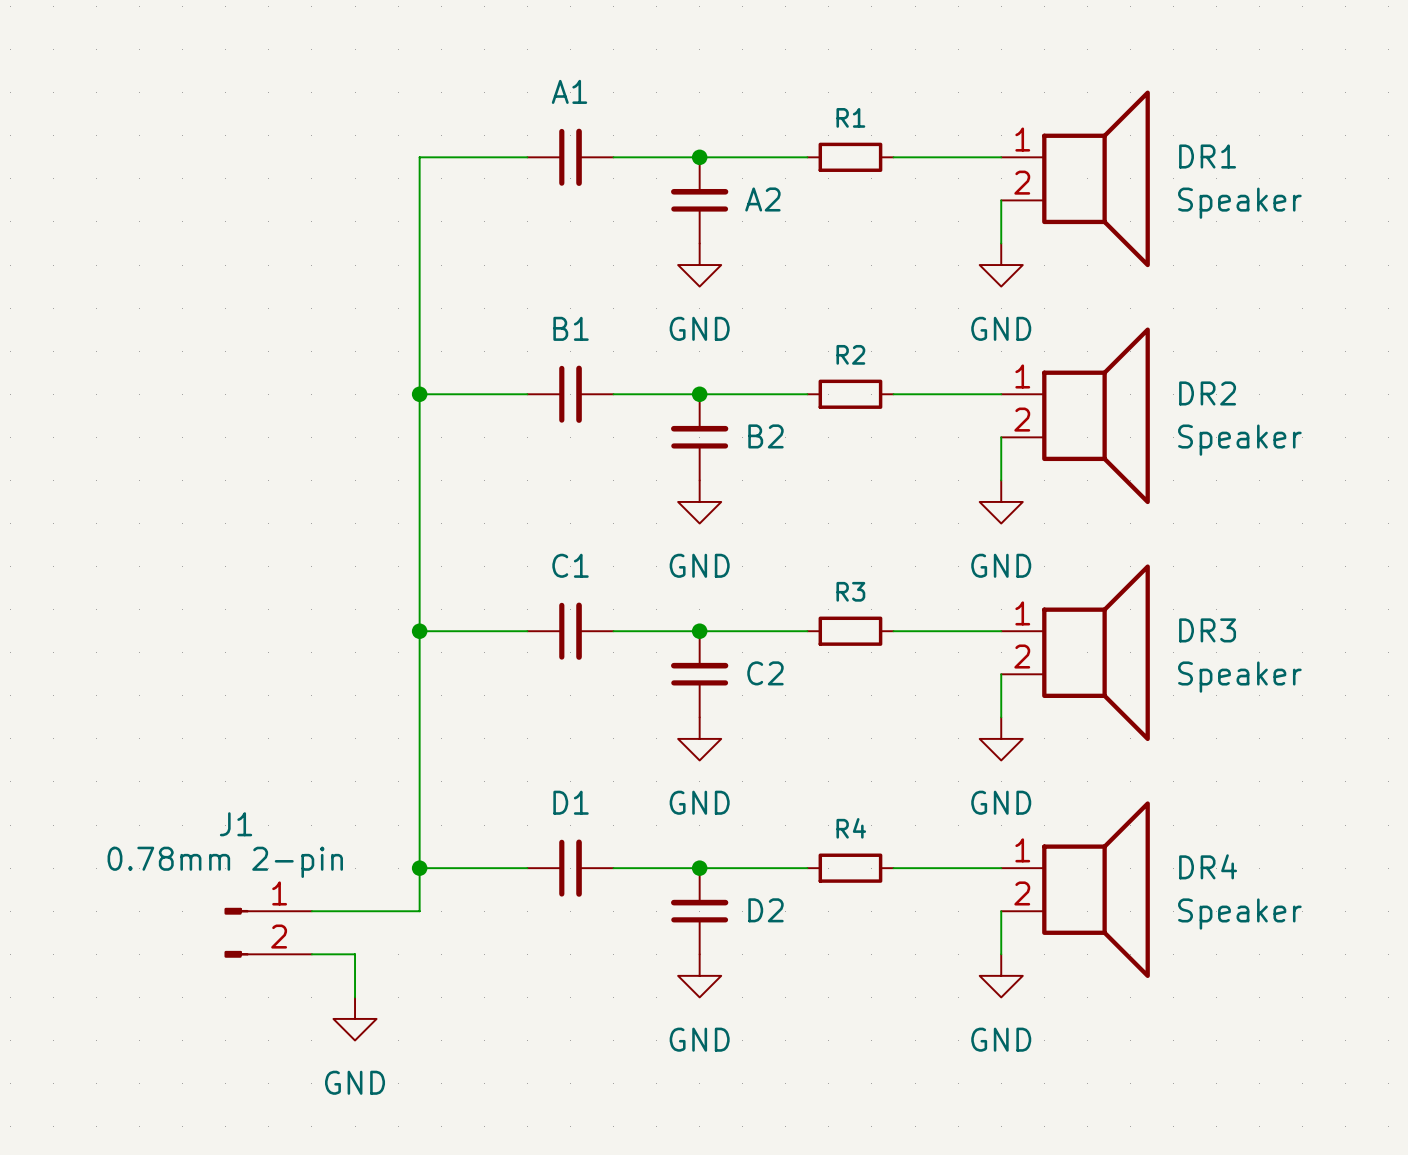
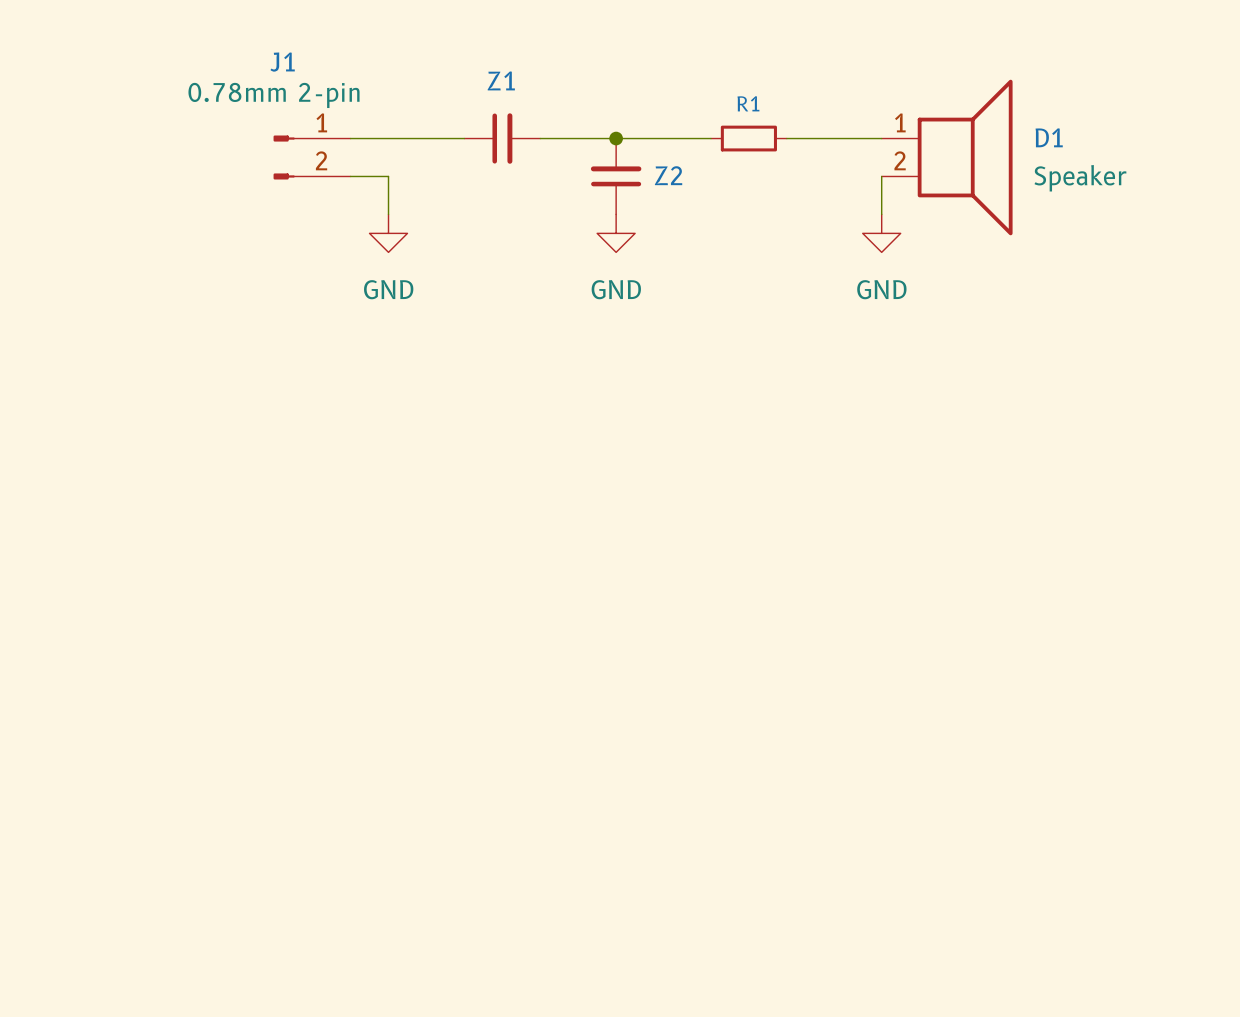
A1 name: A1 (569, 91) -> Z1 (501, 80)
DR1 name: DR1 (1207, 156) -> D1 (1049, 137)
wire: (419, 157) (419, 911) (311, 911) -> (369, 138) (350, 138)
A2 name: A2 (762, 199) -> Z2 (668, 175)
wire: none -> (350, 176) (388, 176) (388, 214)
power symbol: none -> GND (388, 233)
wire: (419, 394) (527, 394) -> none
junction: (419, 394) -> none
B1: (570, 394) -> none
wire: (613, 394) (807, 394) -> none
junction: (699, 394) -> none
R2: (850, 394) -> none
wire: (893, 394) (1001, 394) -> none
DR2: Speaker (1075, 415) -> none
B2: (699, 437) -> none
wire: (1001, 437) (1001, 480) -> none
power symbol: GND (699, 501) -> none
power symbol: GND (1001, 501) -> none
wire: (419, 631) (527, 631) -> none
junction: (419, 631) -> none
C1: (570, 631) -> none
wire: (613, 631) (807, 631) -> none
junction: (699, 631) -> none
R3: (850, 631) -> none
wire: (893, 631) (1001, 631) -> none
DR3: Speaker (1075, 652) -> none
C2: (699, 674) -> none
wire: (1001, 674) (1001, 717) -> none
power symbol: GND (699, 738) -> none
power symbol: GND (1001, 738) -> none
wire: (419, 868) (527, 868) -> none
junction: (419, 868) -> none
D1: (570, 868) -> none
wire: (613, 868) (807, 868) -> none
junction: (699, 868) -> none
R4: (850, 868) -> none
wire: (893, 868) (1001, 868) -> none
DR4: Speaker (1075, 889) -> none
D2: (699, 911) -> none
wire: (1001, 911) (1001, 954) -> none
J1 position: (268, 932) -> (312, 157)
wire: (311, 954) (355, 954) (355, 997) -> none
power symbol: GND (699, 975) -> none
power symbol: GND (1001, 975) -> none
power symbol: GND (355, 1018) -> none

